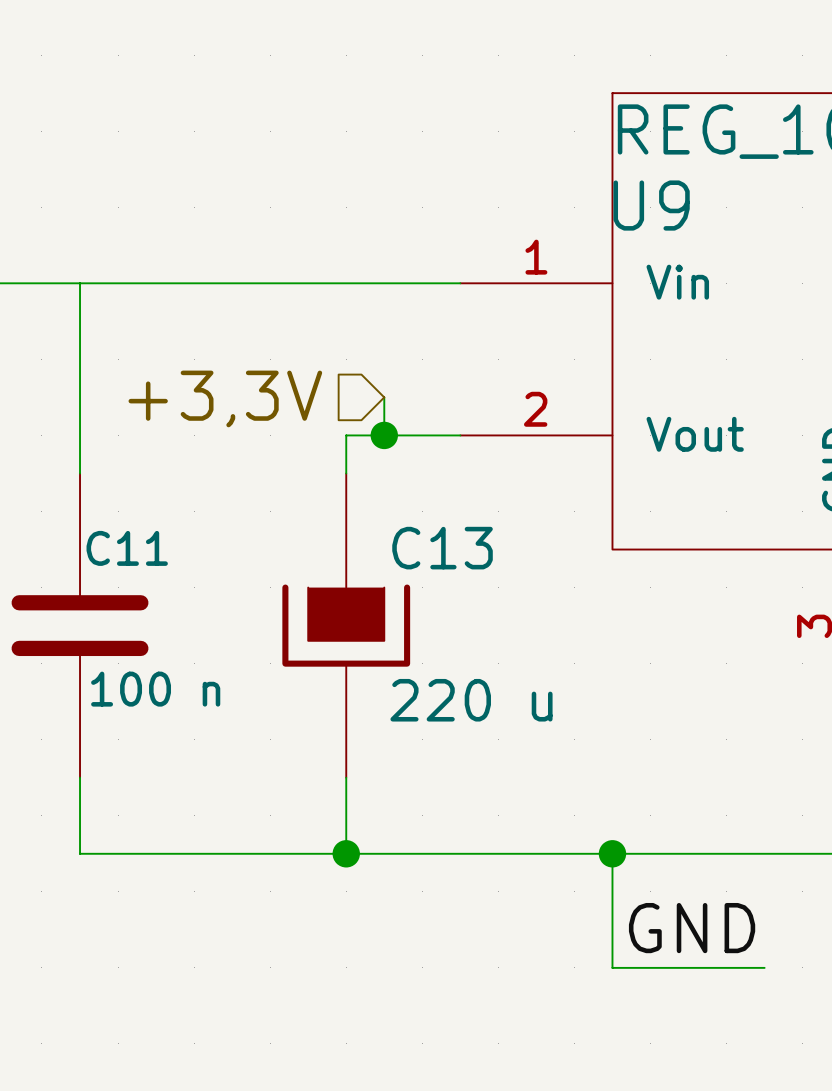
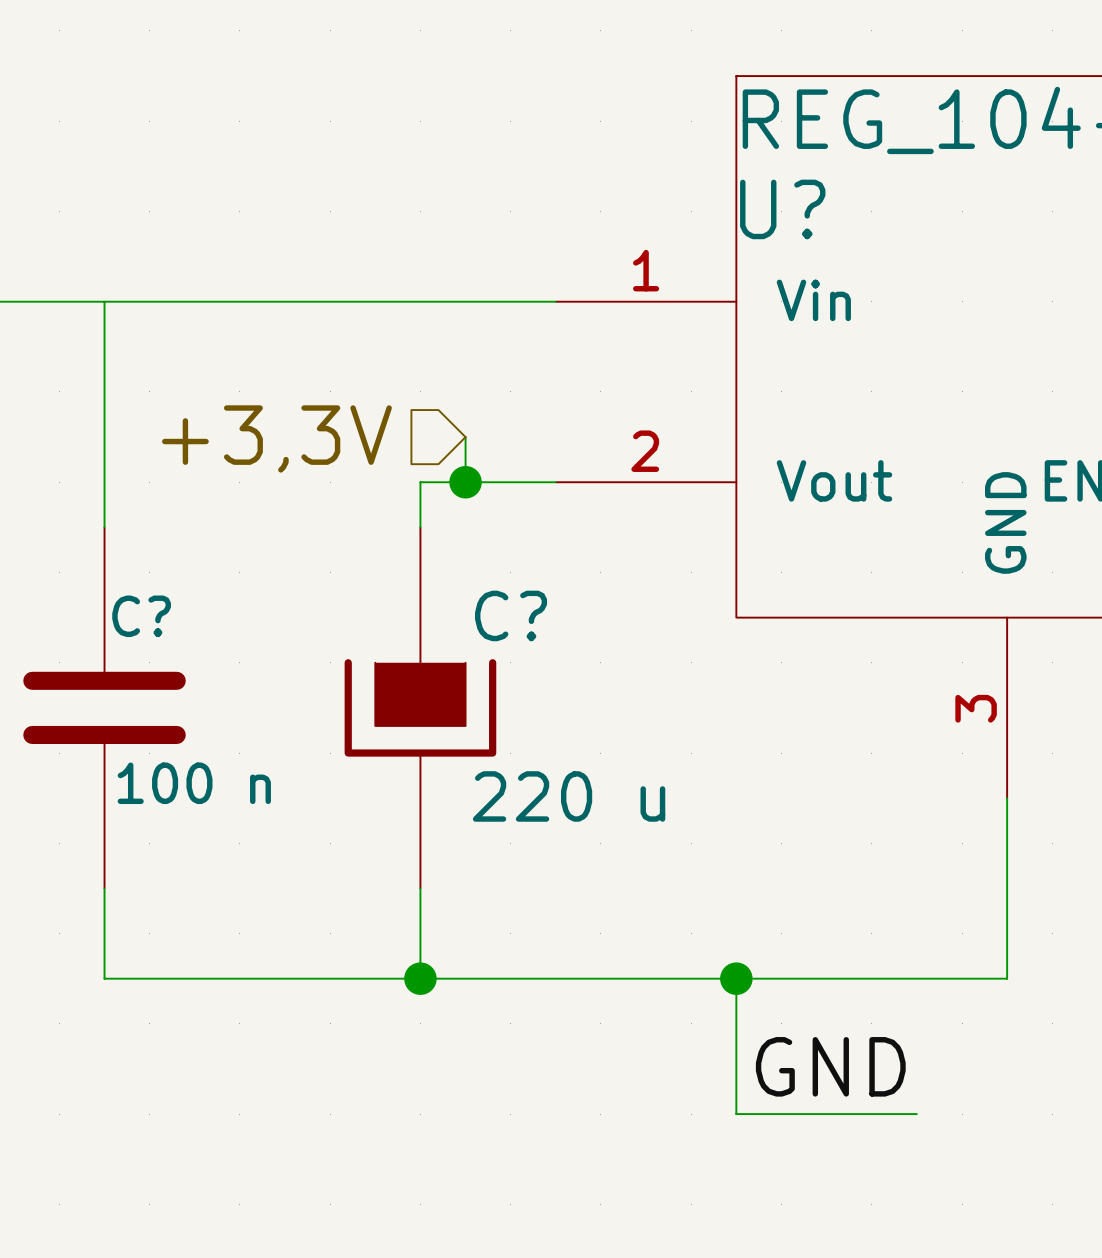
U9 name: U9 (651, 205) -> U? (782, 209)
C11 name: C11 (127, 548) -> C? (141, 616)
C13 name: C13 (442, 548) -> C? (511, 615)

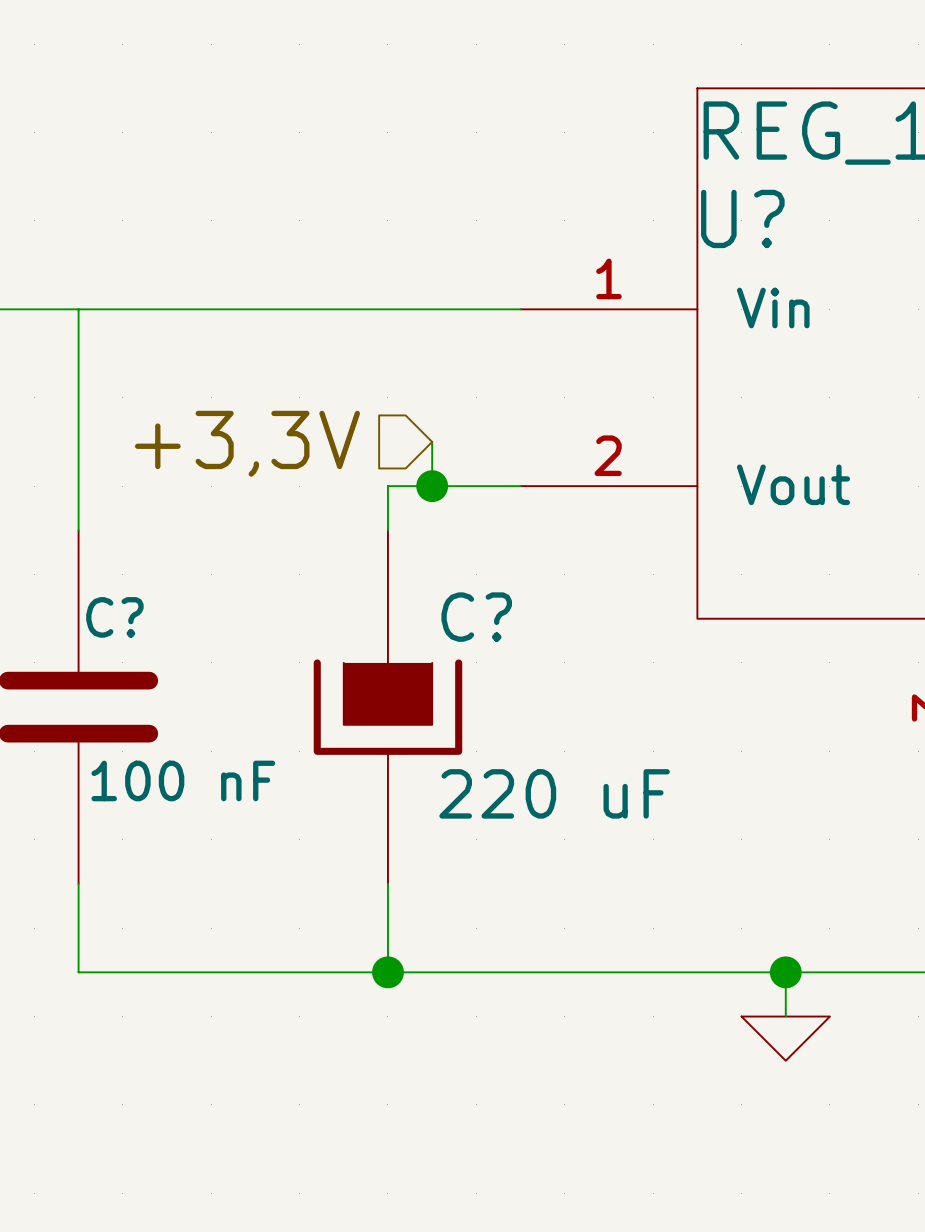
C? value: 100 n (194, 783) -> 100 nF (183, 780)
C? value: 220 u (569, 796) -> 220 uF (554, 793)
wire: (736, 978) (736, 1114) (916, 1114) -> none
junction position: (736, 978) -> (785, 972)
wire: none -> (785, 972) (785, 1016)
power symbol: none -> (785, 1038)
label: GND (830, 1066) -> none

